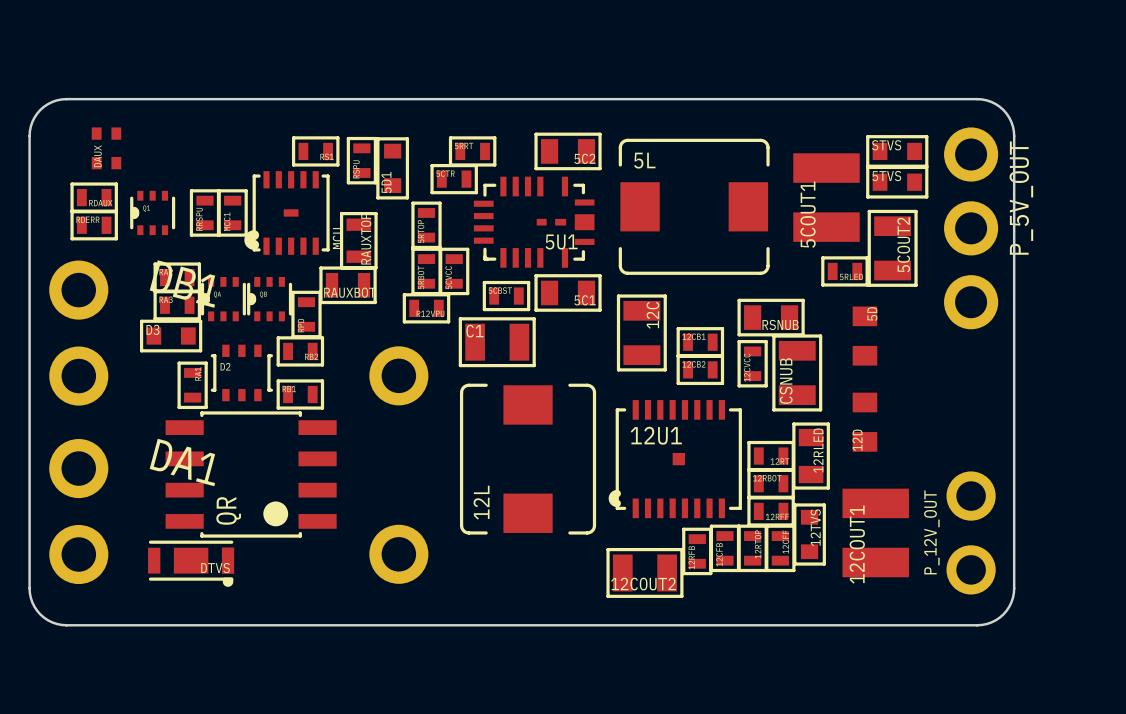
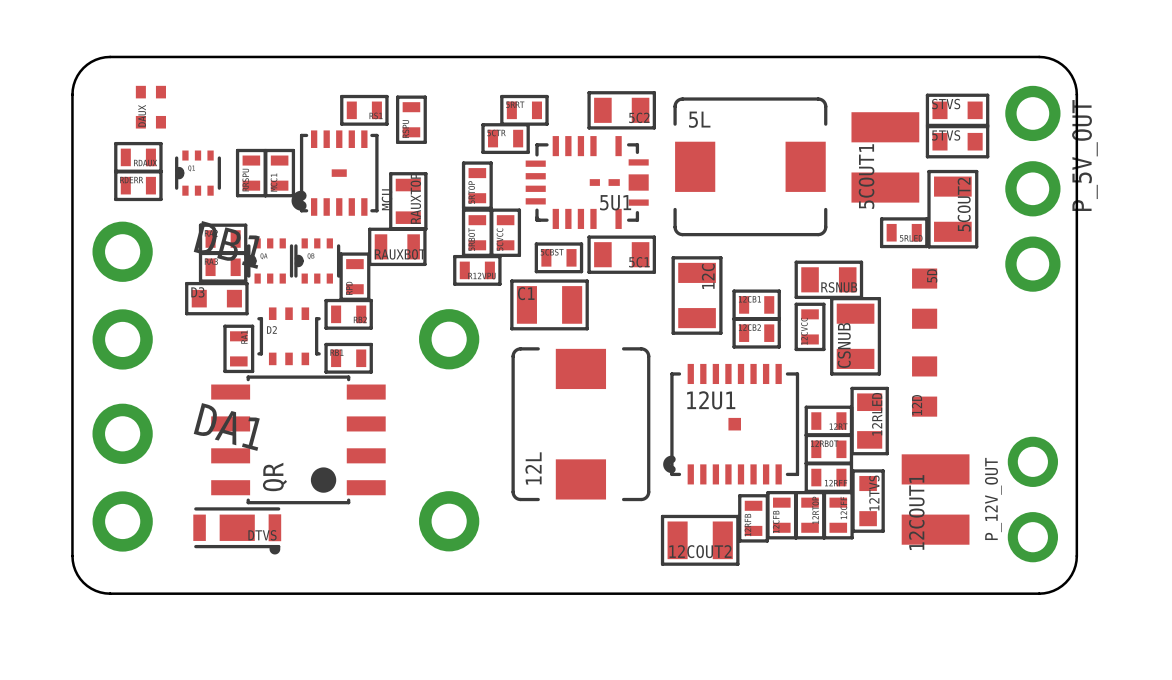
5D1: (392, 168) -> none

